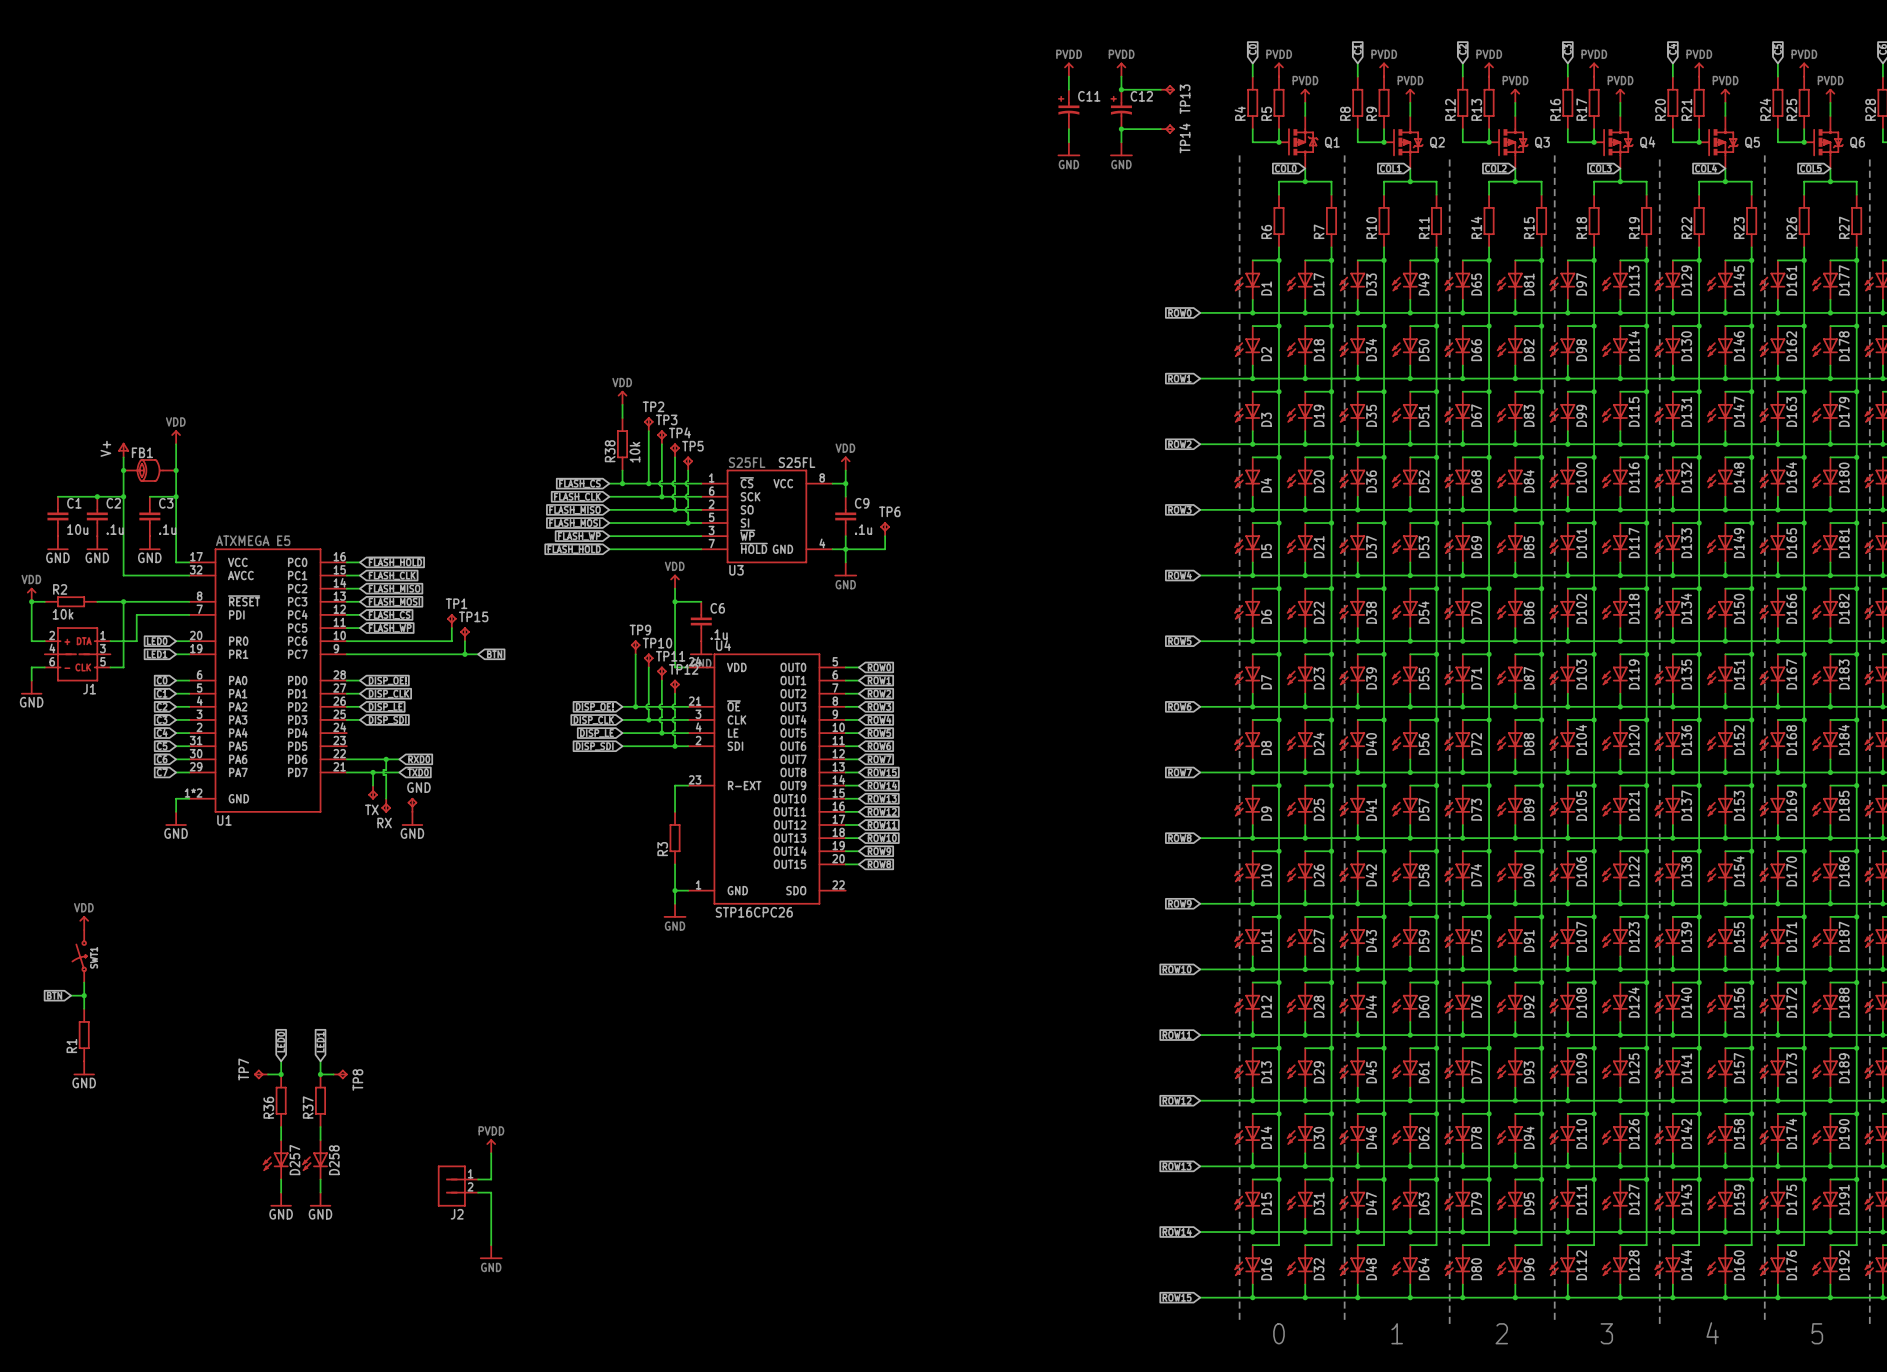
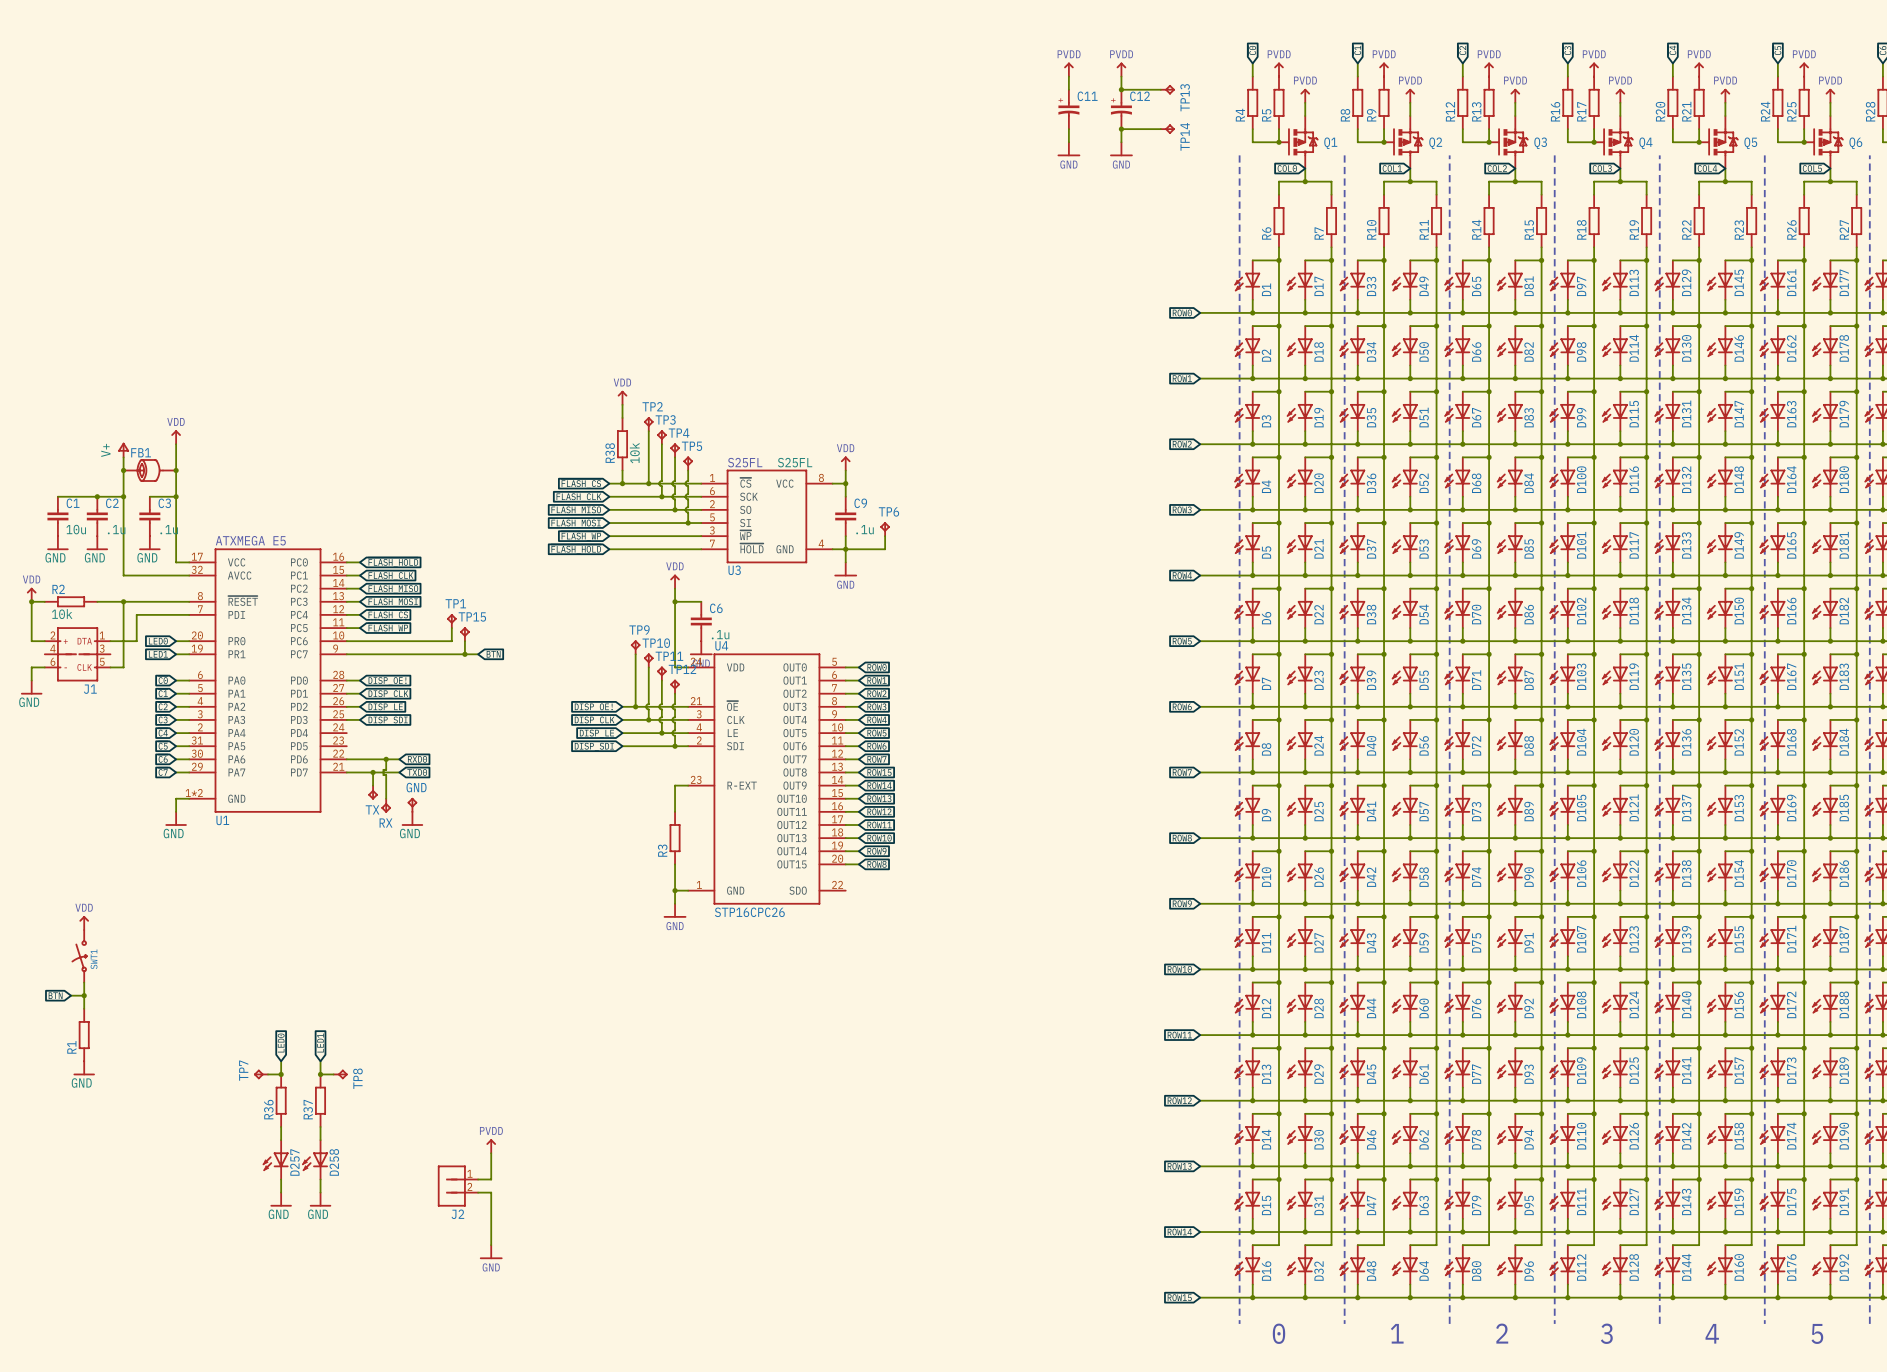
Q2 flip: as is (1403, 142) -> up-down (1403, 142)
Q3 flip: as is (1508, 142) -> up-down (1508, 142)
Q4 flip: as is (1613, 142) -> up-down (1613, 142)
Q5 flip: as is (1718, 142) -> up-down (1718, 142)
Q6 flip: as is (1823, 142) -> up-down (1823, 142)

